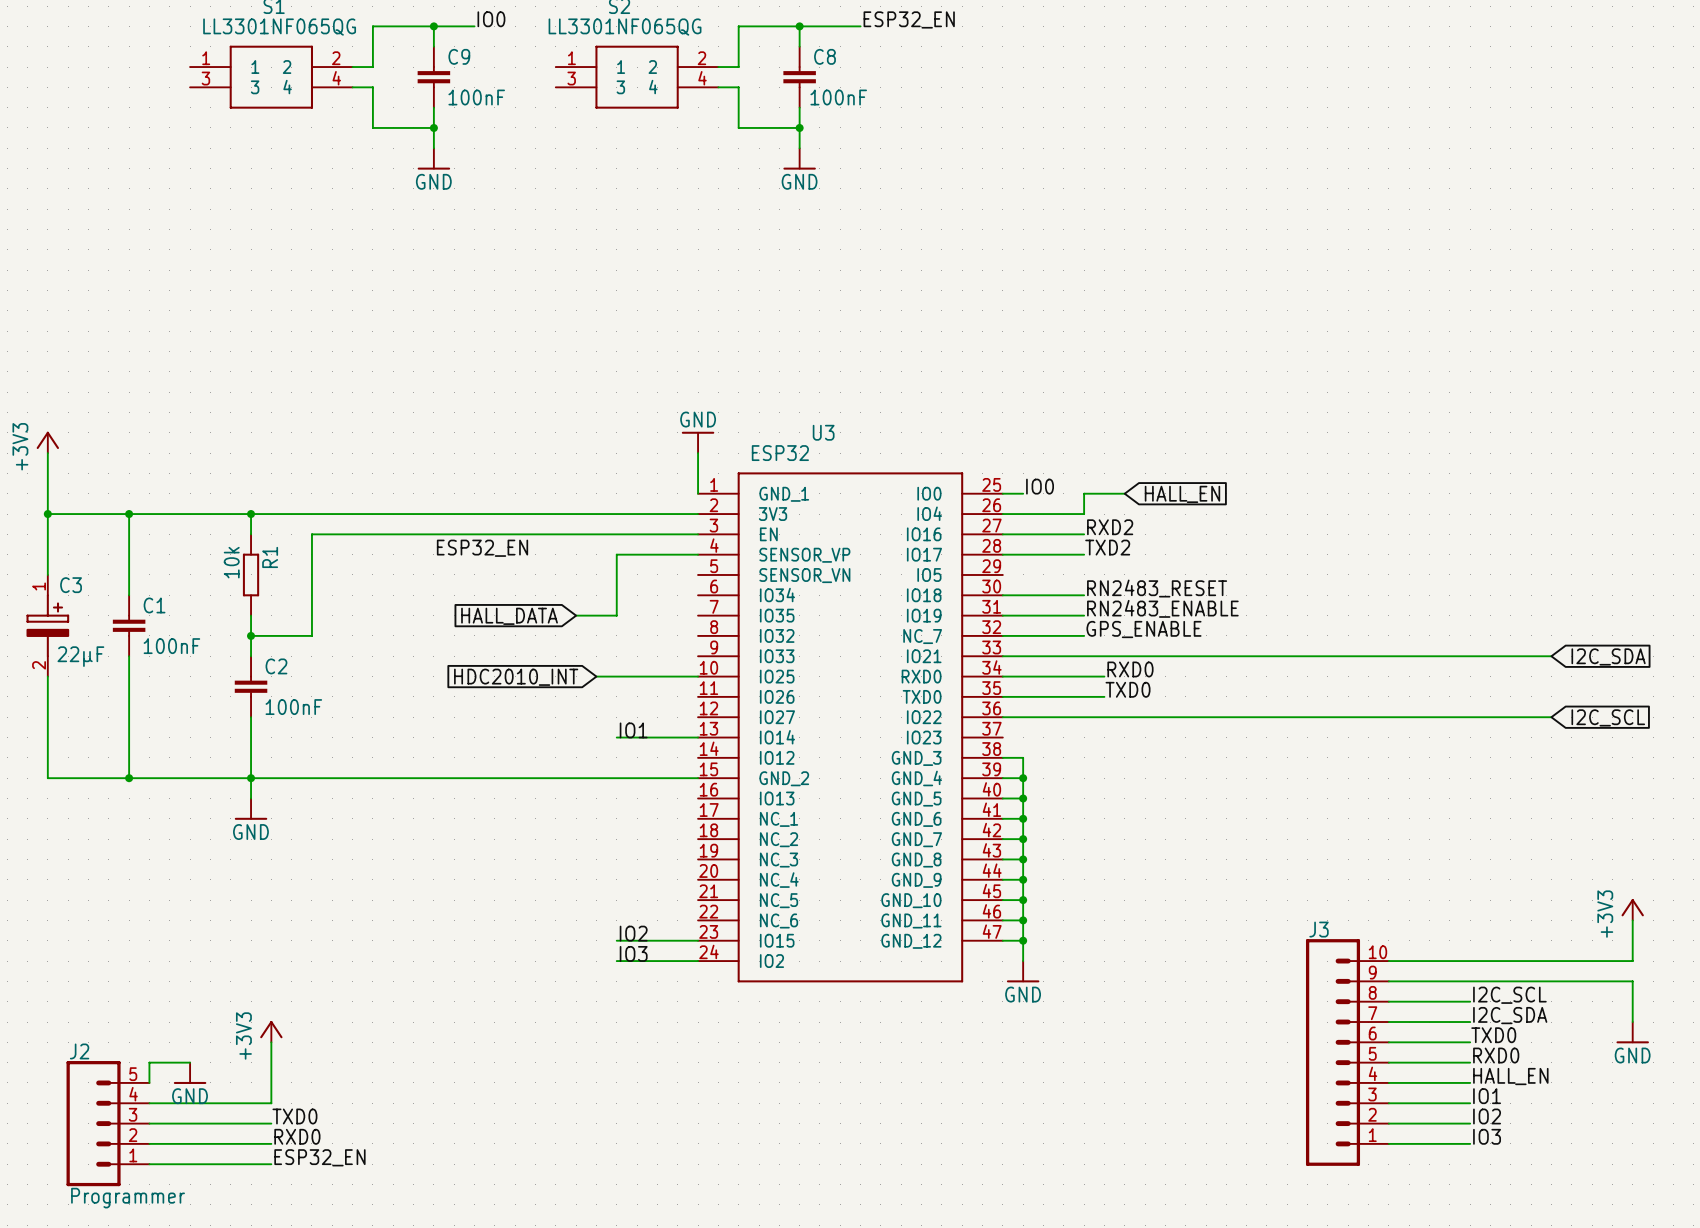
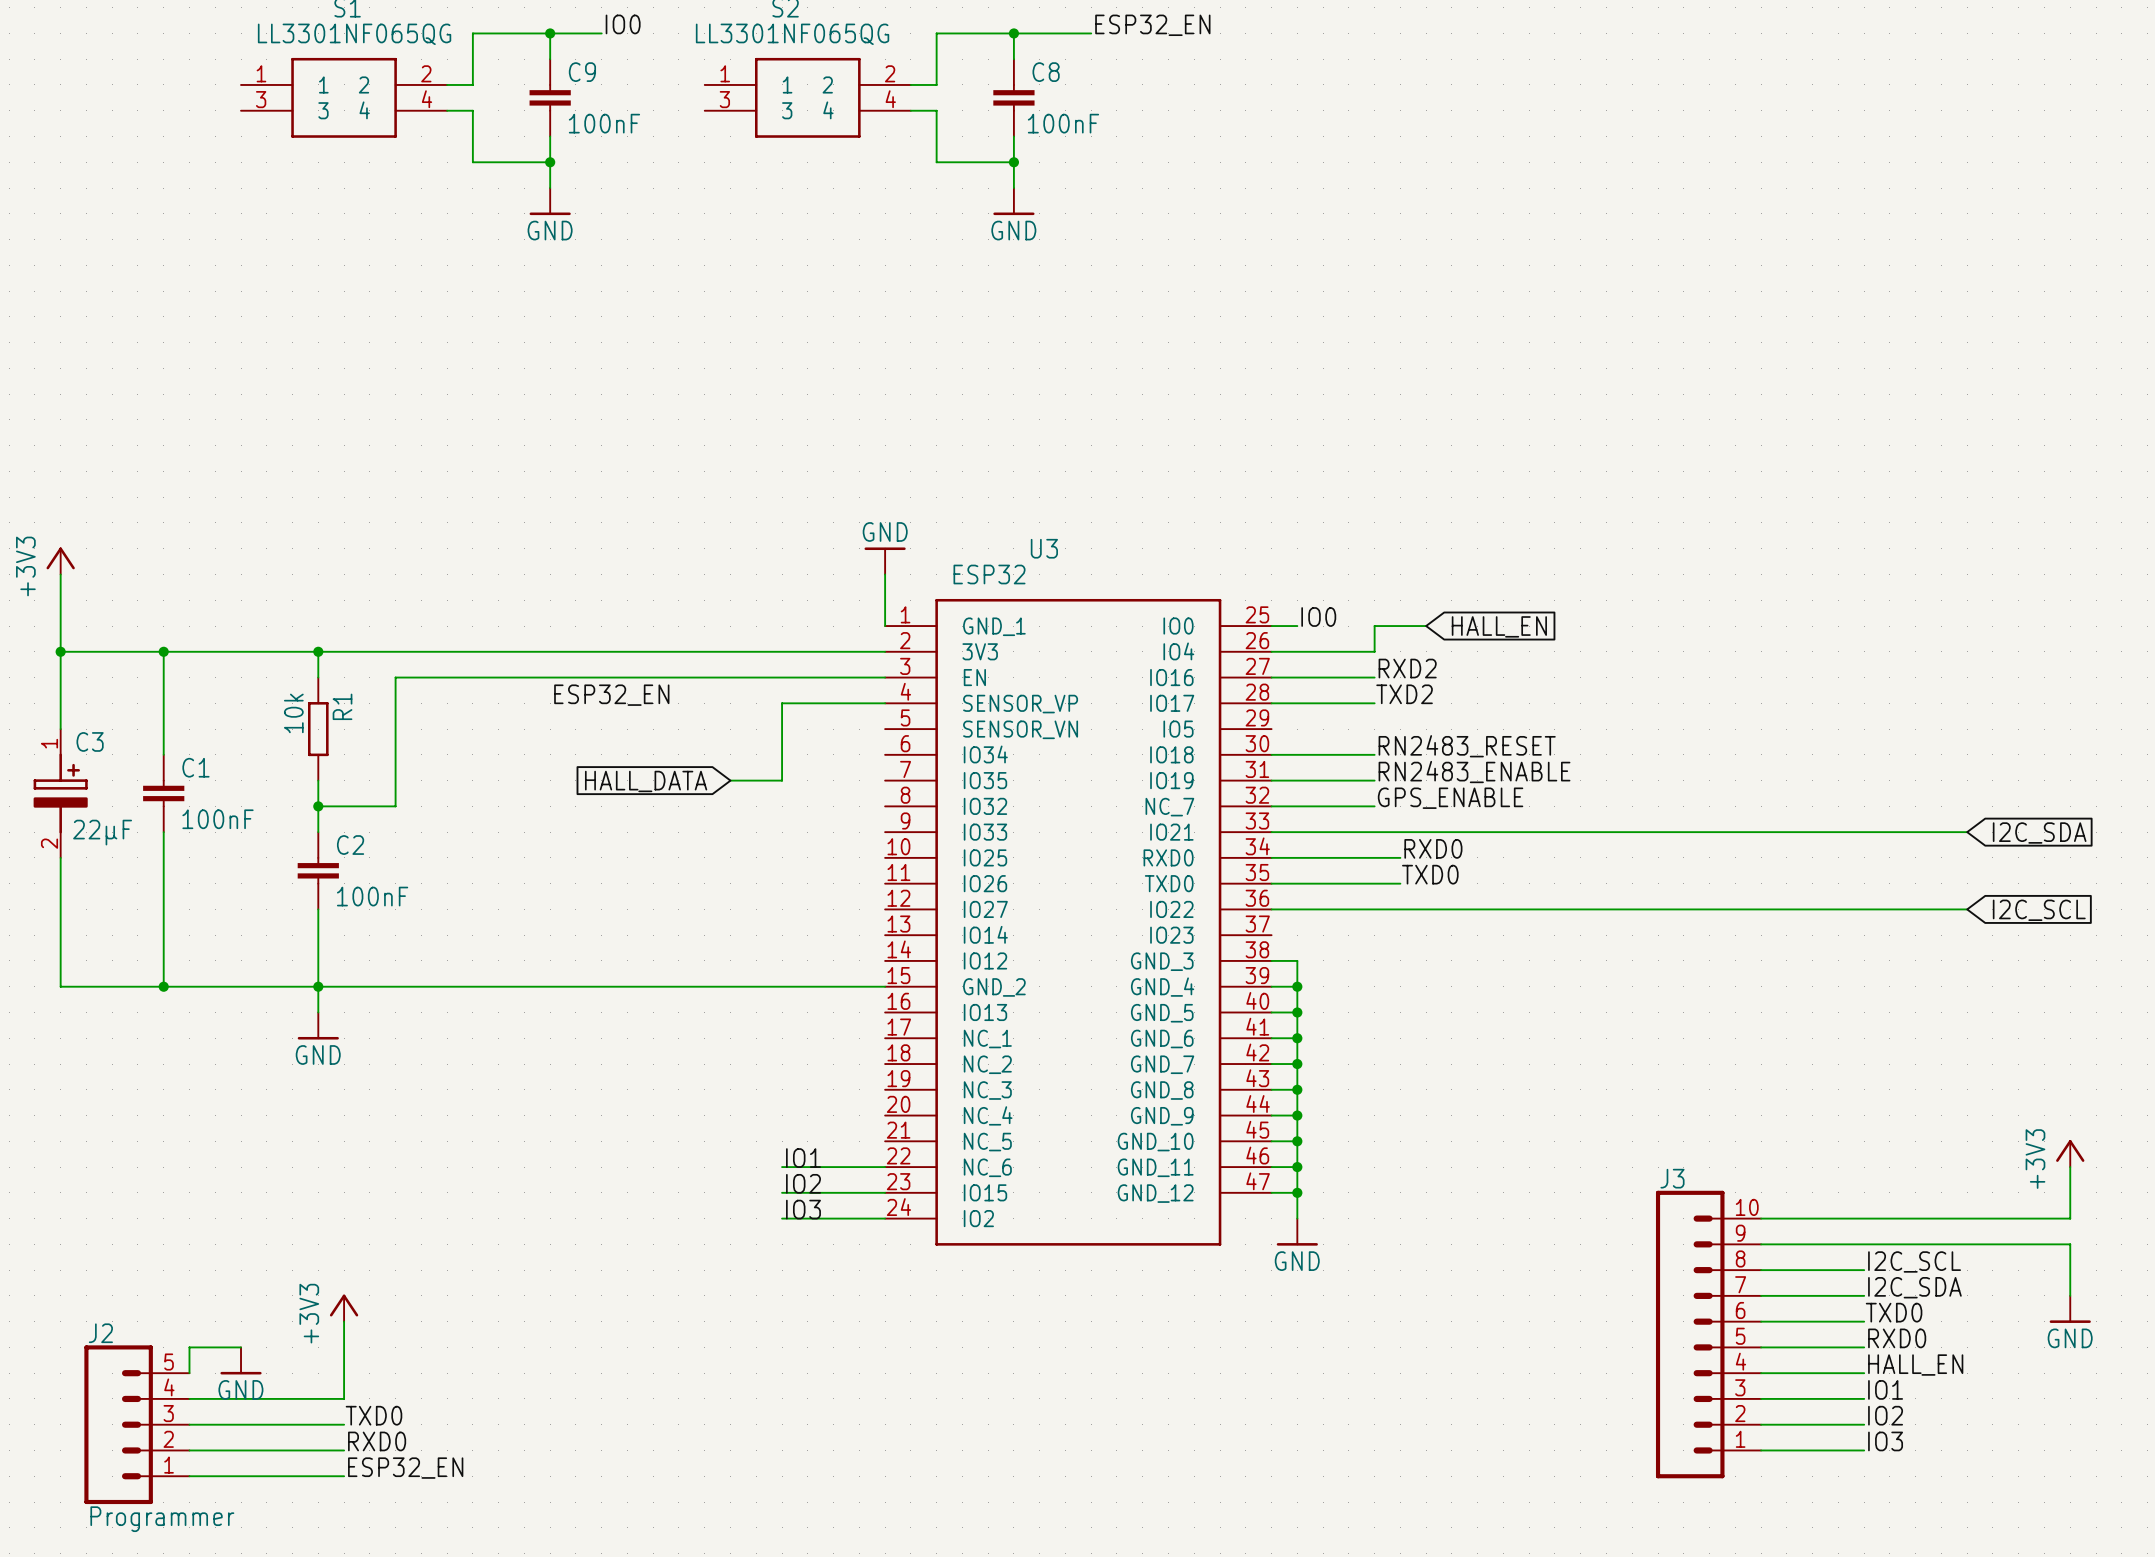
wire: (596, 676) (698, 676) -> none
global label: HDC2010_INT (516, 677) -> none
label position: IO1 (633, 730) -> IO1 (803, 1158)
wire: (616, 737) (698, 737) -> (782, 1167) (885, 1167)

